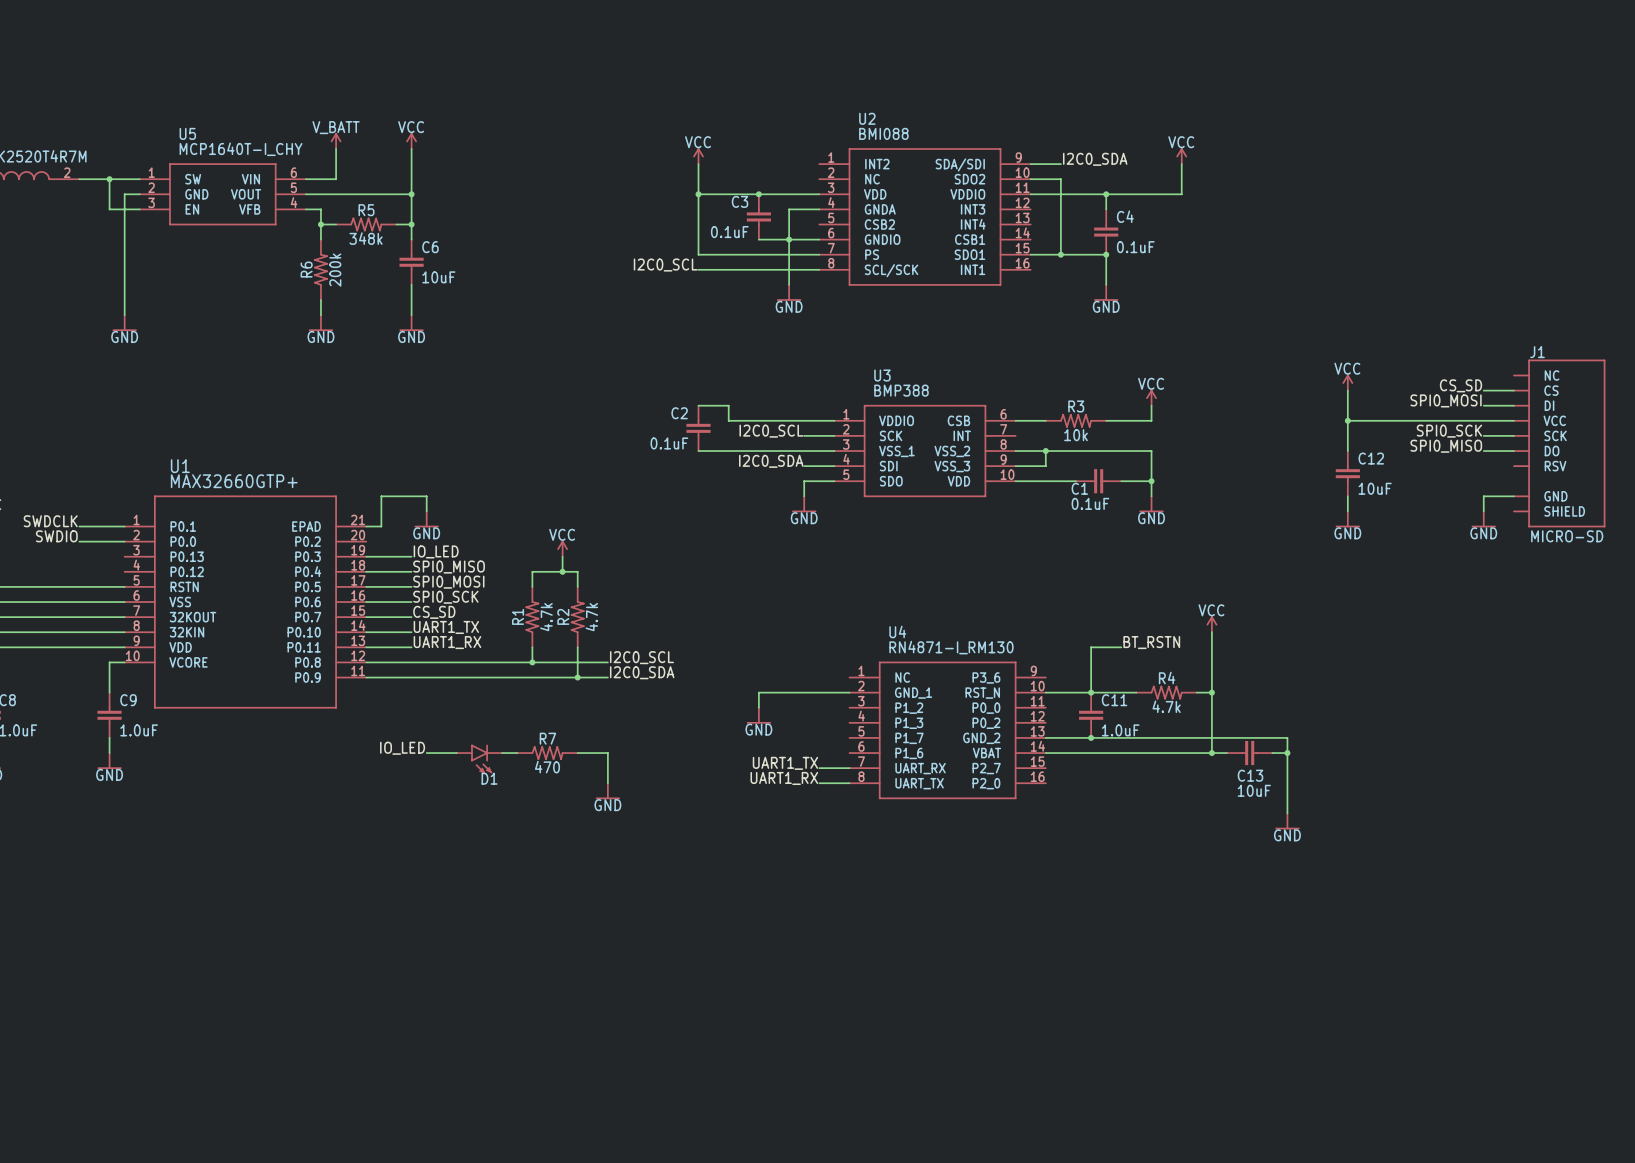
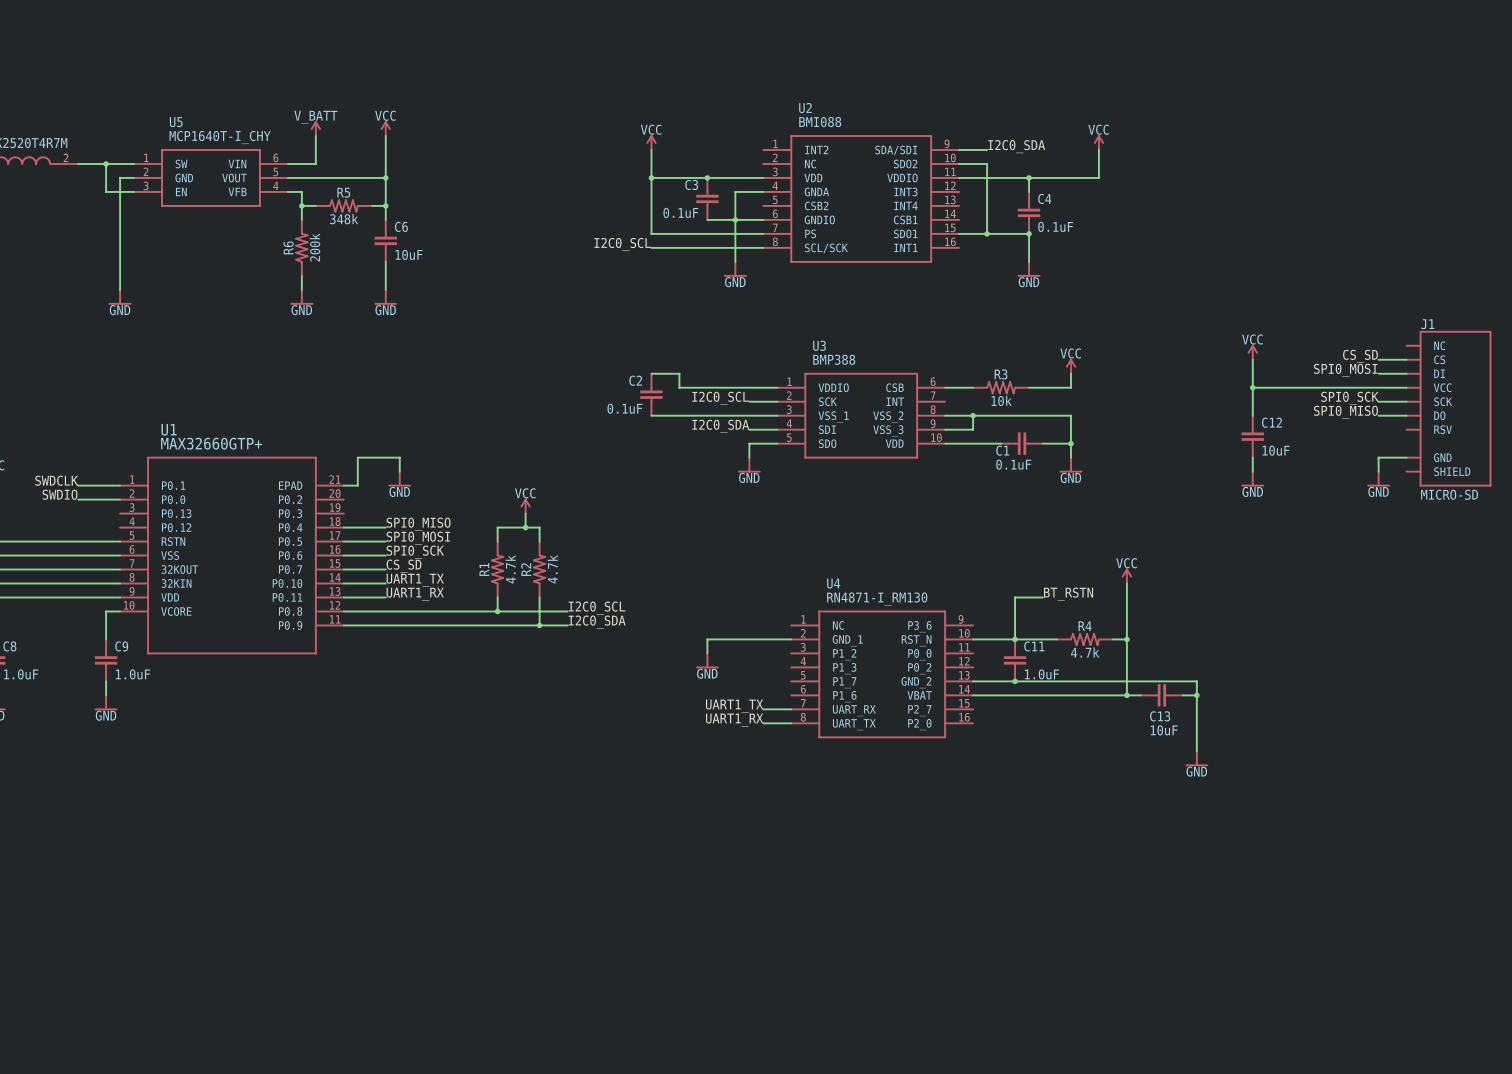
label: IO_LED (436, 551) -> none
wire: (366, 556) (411, 556) -> none
label: IO_LED (402, 748) -> none
wire: (426, 753) (456, 753) -> none
wire: (502, 753) (517, 753) -> none
R7: 470 (547, 753) -> none
wire: (577, 753) (607, 753) (607, 783) -> none
D1: (479, 759) -> none
power symbol: GND (607, 791) -> none

